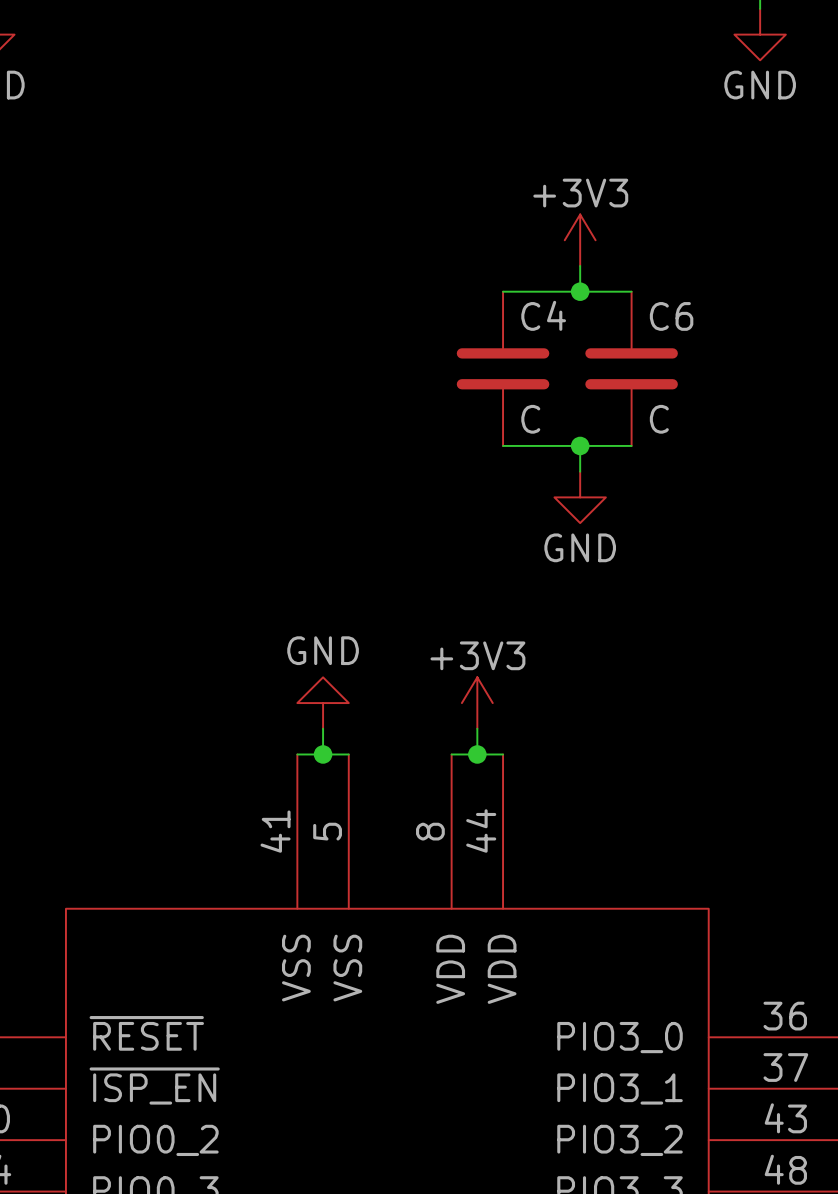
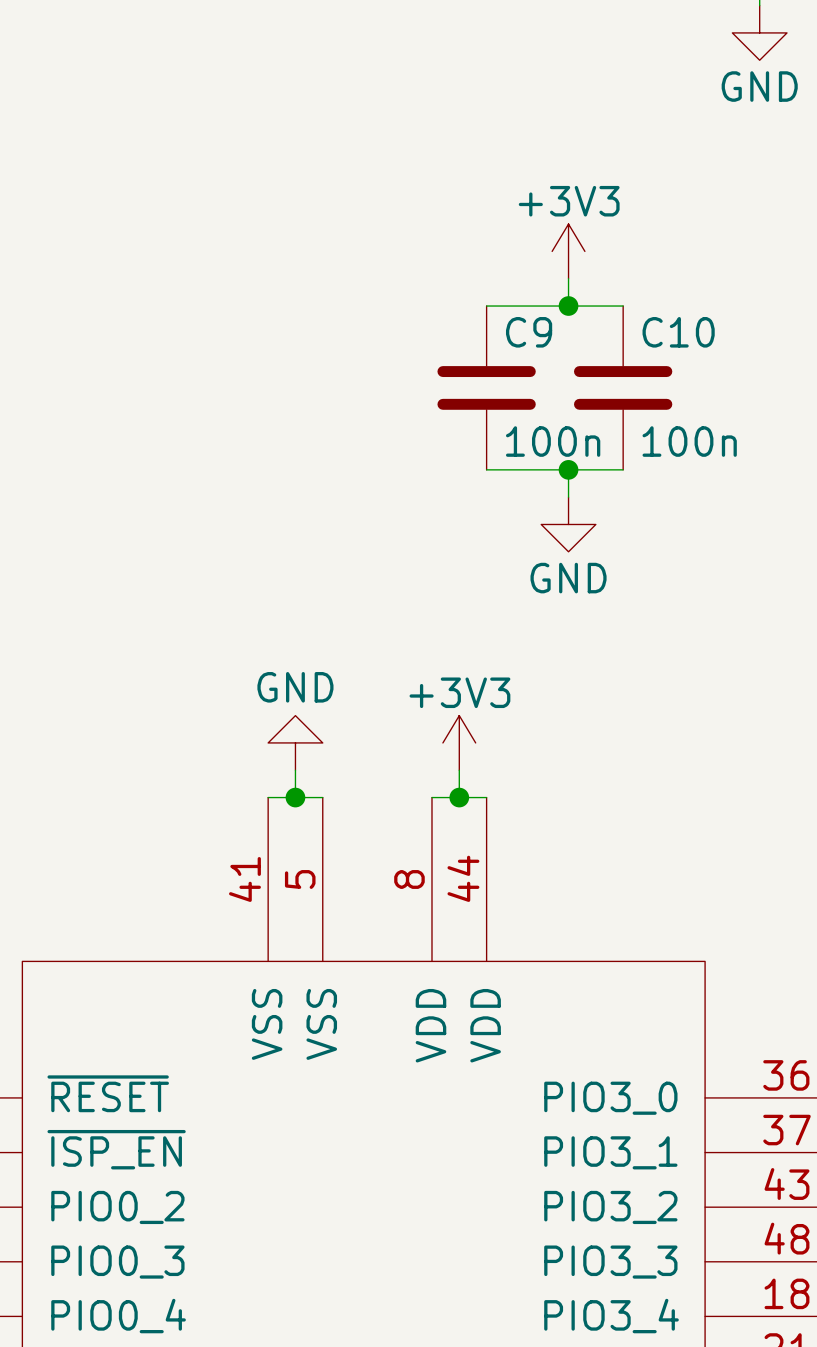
C4 name: C4 (543, 315) -> C9 (529, 332)
C6 name: C6 (671, 316) -> C10 (678, 332)
C4 value: C (530, 419) -> 100n (553, 441)
C6 value: C (659, 419) -> 100n (689, 441)

